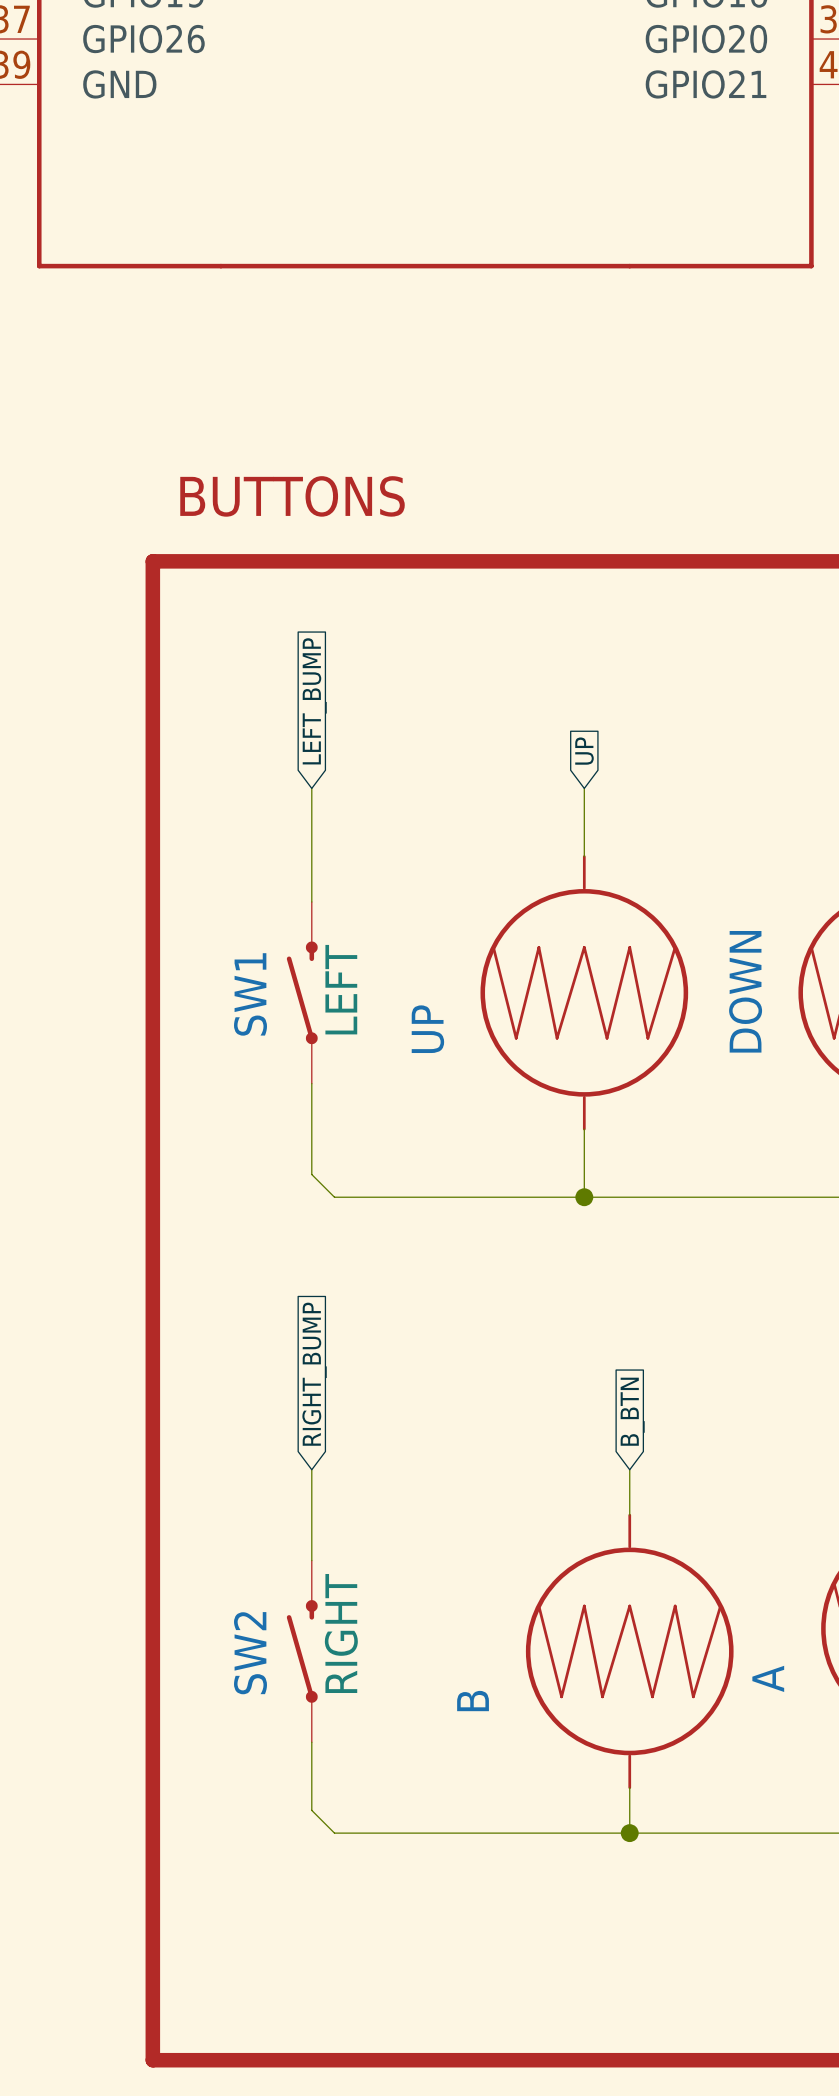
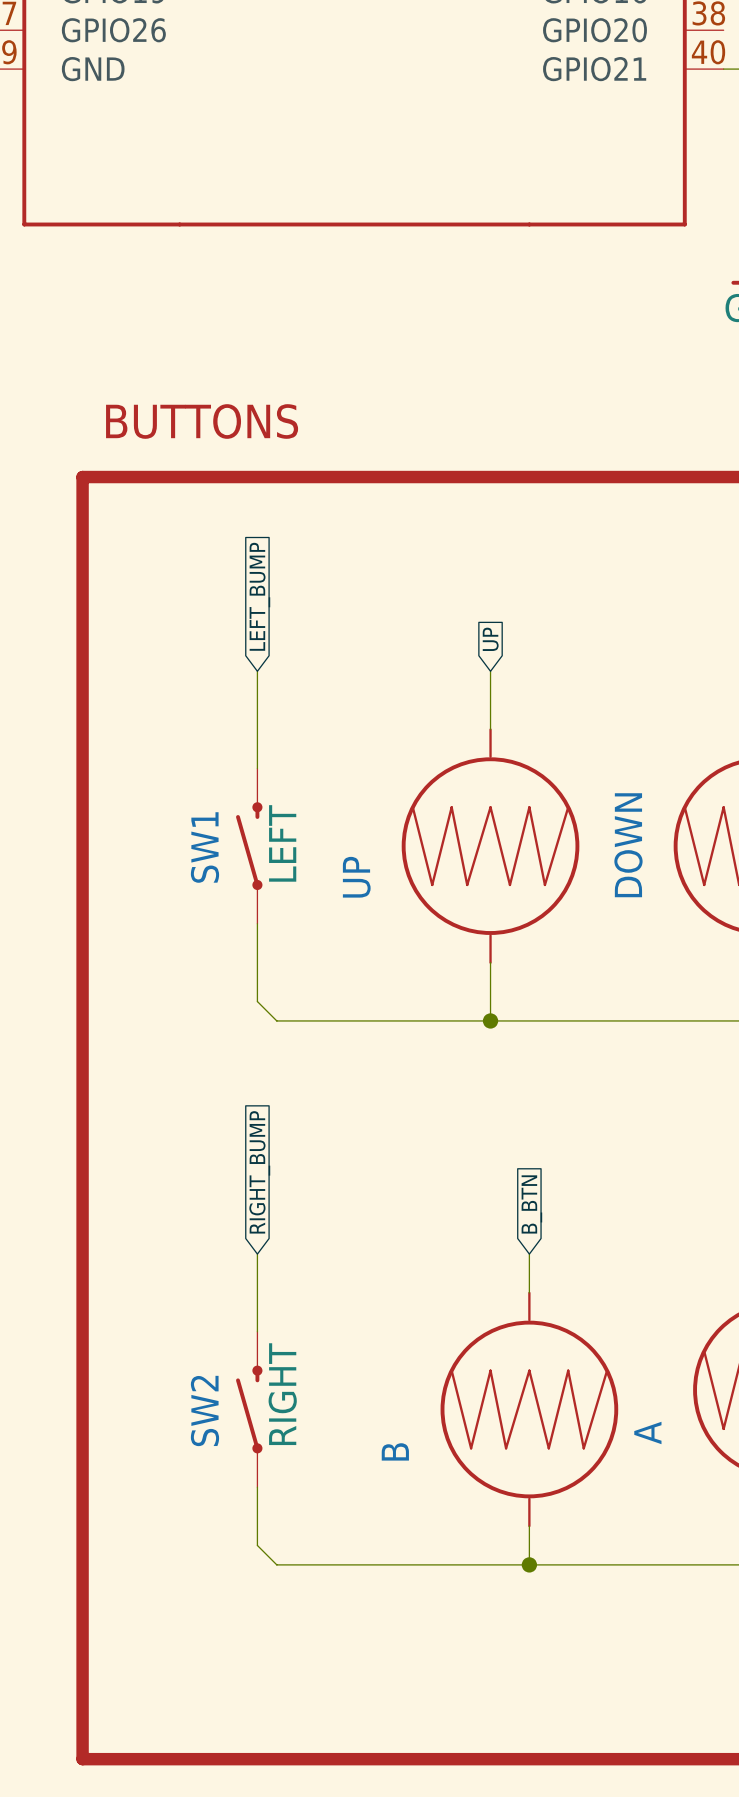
text position: BUTTONS (292, 496) -> BUTTONS (202, 421)
line: (152, 561) (152, 2060) -> (121, 477) (82, 477) (82, 1759) (121, 1759)

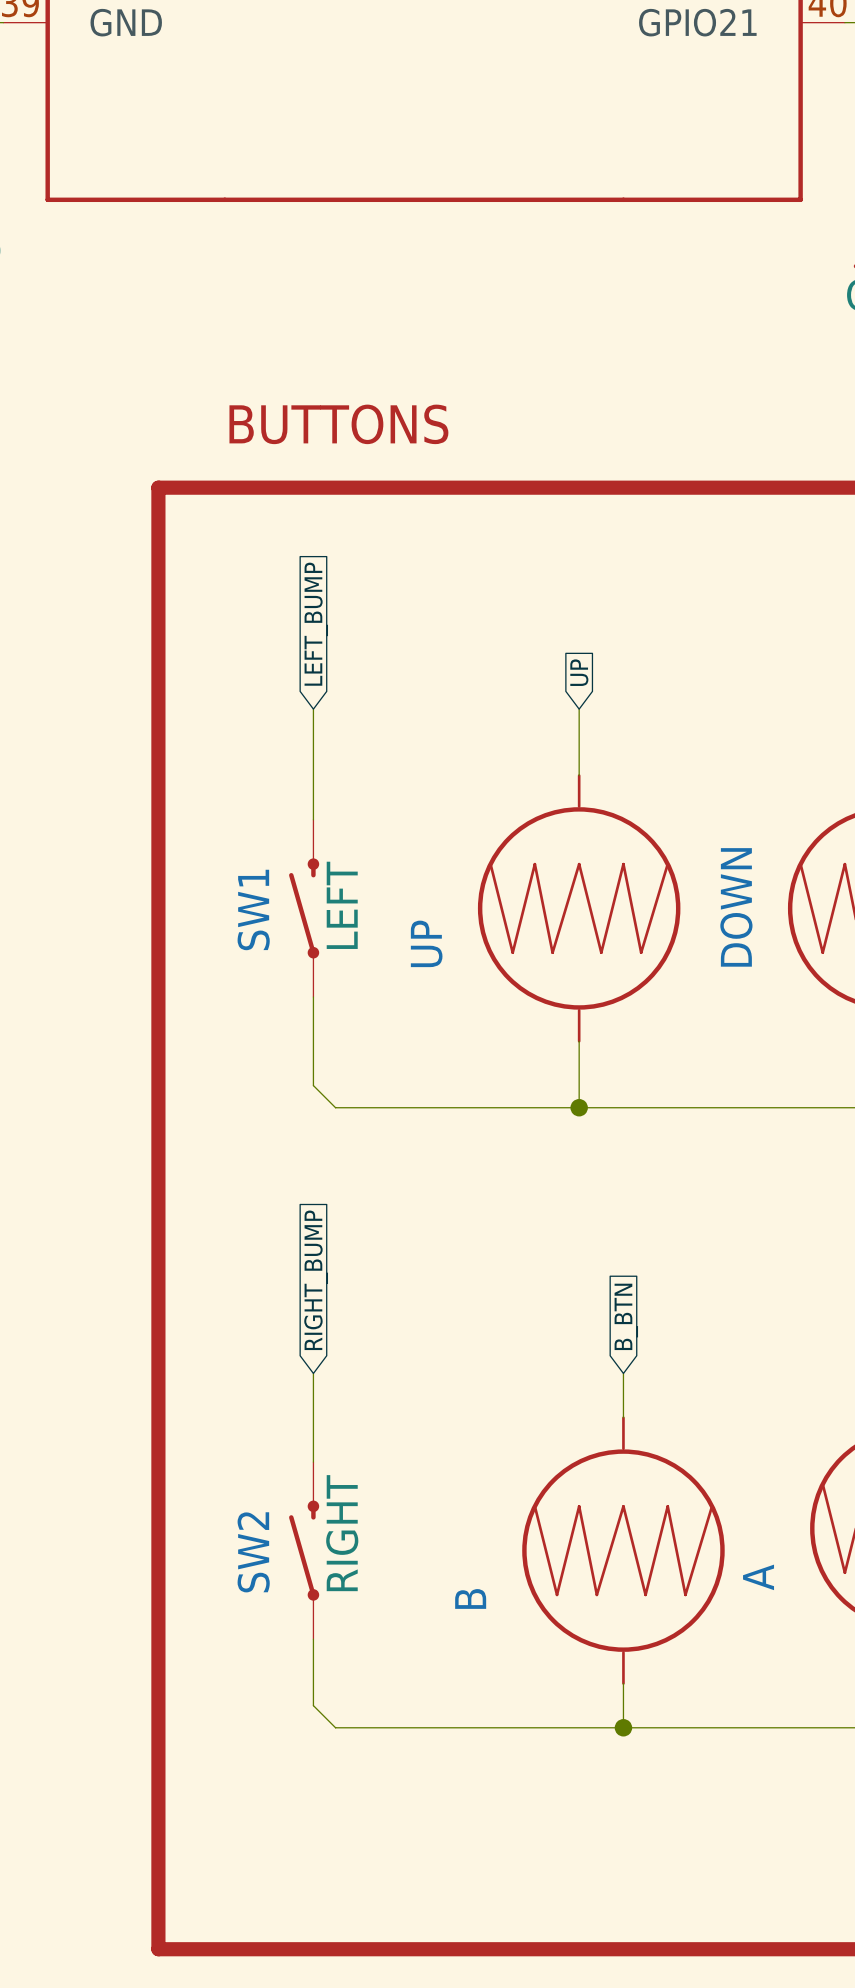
text position: BUTTONS (202, 421) -> BUTTONS (338, 424)
line: (121, 477) (82, 477) (82, 1759) (121, 1759) -> (158, 487) (158, 1949)

